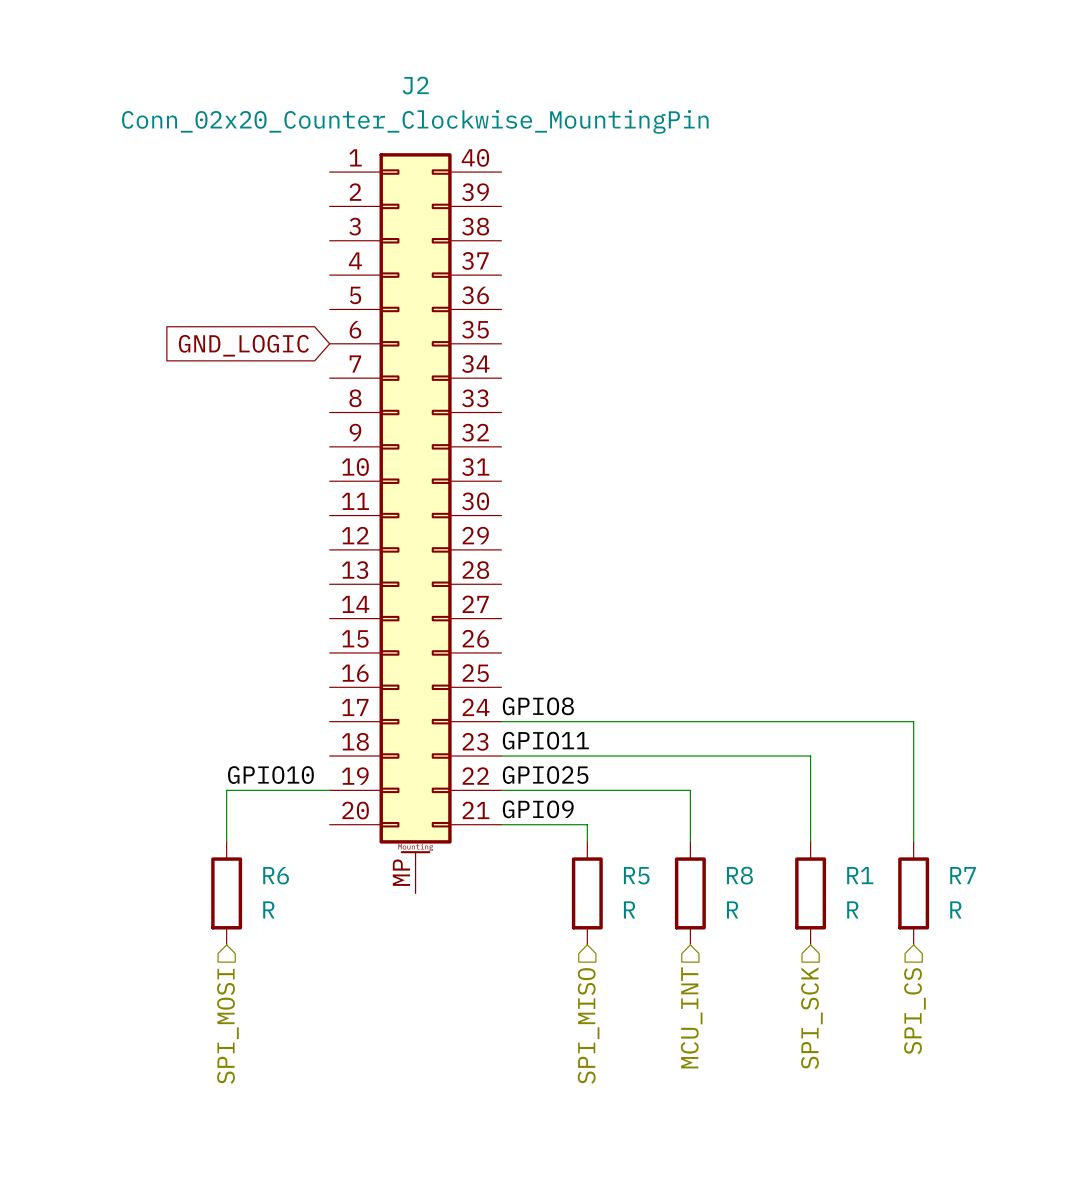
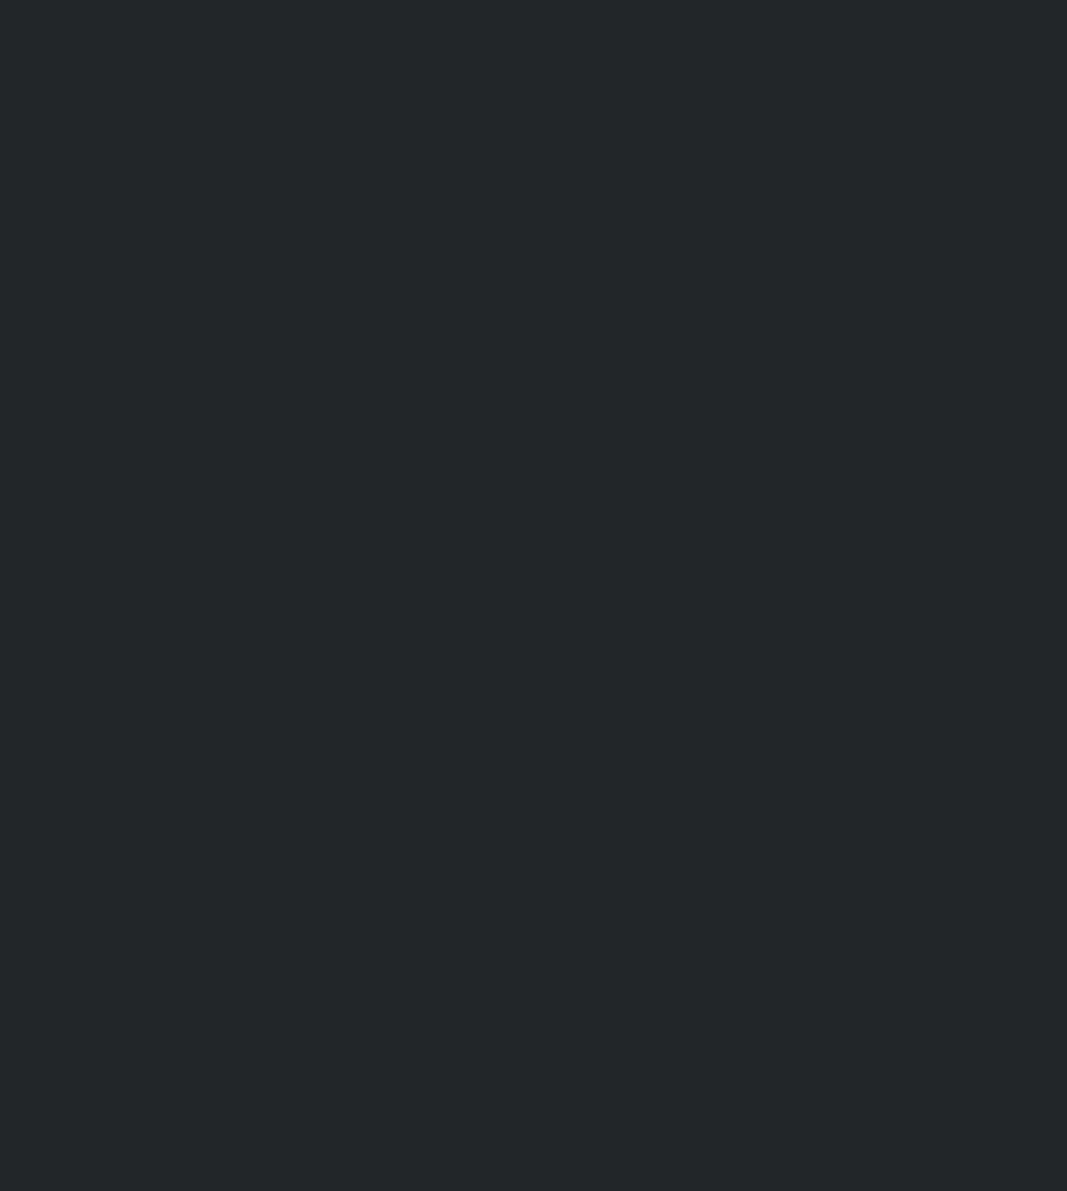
global label: GND_LOGIC (243, 345) -> none
J2: Conn_02x20_Counter_Clockwise_MountingPin (415, 523) -> none
label: GPIO8 (538, 706) -> none
wire: (501, 721) (913, 721) (913, 841) -> none
label: GPIO11 (545, 740) -> none
wire: (501, 756) (810, 756) (810, 841) -> none
label: GPIO10 (270, 775) -> none
label: GPIO25 (545, 775) -> none
wire: (329, 790) (226, 790) (226, 841) -> none
wire: (501, 790) (690, 790) (690, 841) -> none
label: GPIO9 (538, 809) -> none
wire: (501, 824) (587, 824) (587, 841) -> none
R6: R (226, 893) -> none
R5: R (587, 893) -> none
R8: R (690, 893) -> none
R1: R (810, 893) -> none
R7: R (913, 893) -> none
hierarchical label: SPI_CS (914, 1011) -> none
hierarchical label: MCU_INT (691, 1017) -> none
hierarchical label: SPI_SCK (811, 1018) -> none
hierarchical label: SPI_MISO (588, 1025) -> none
hierarchical label: SPI_MOSI (227, 1026) -> none

